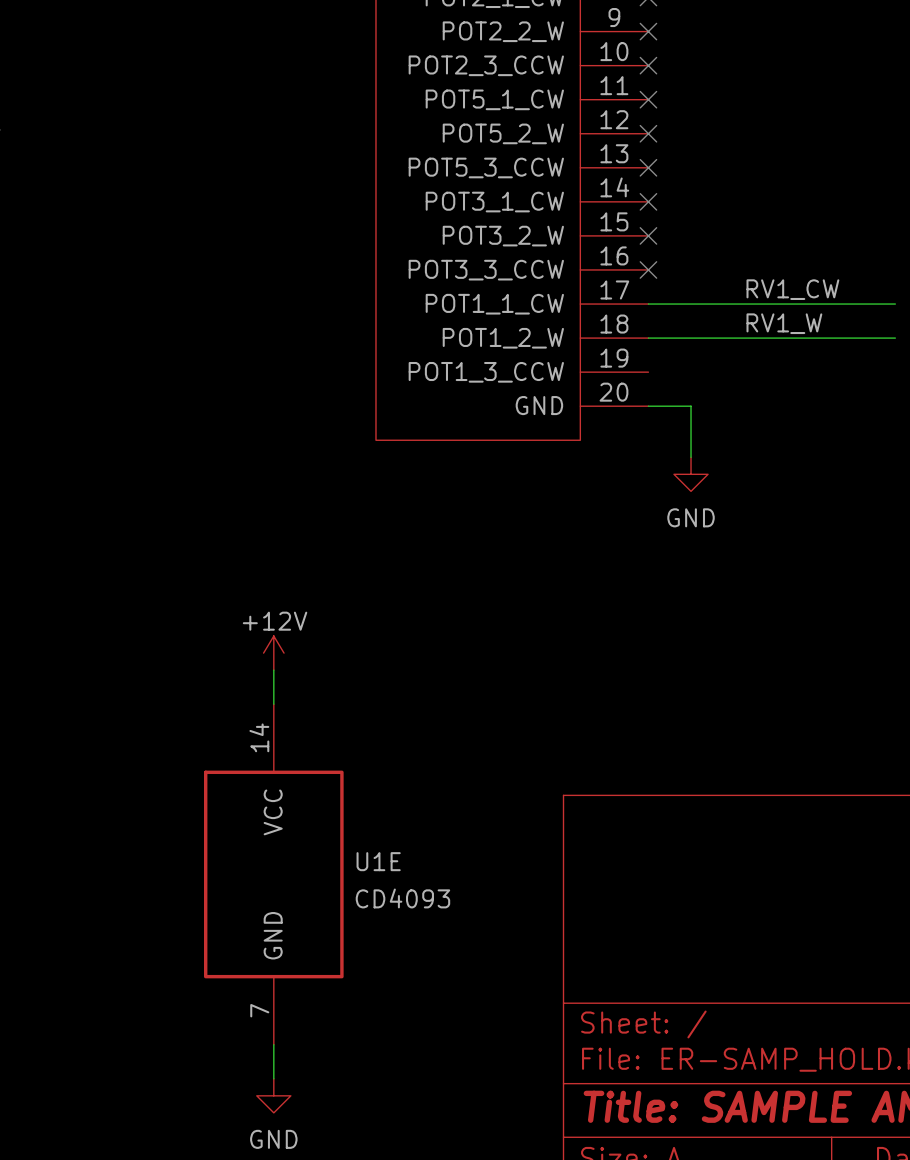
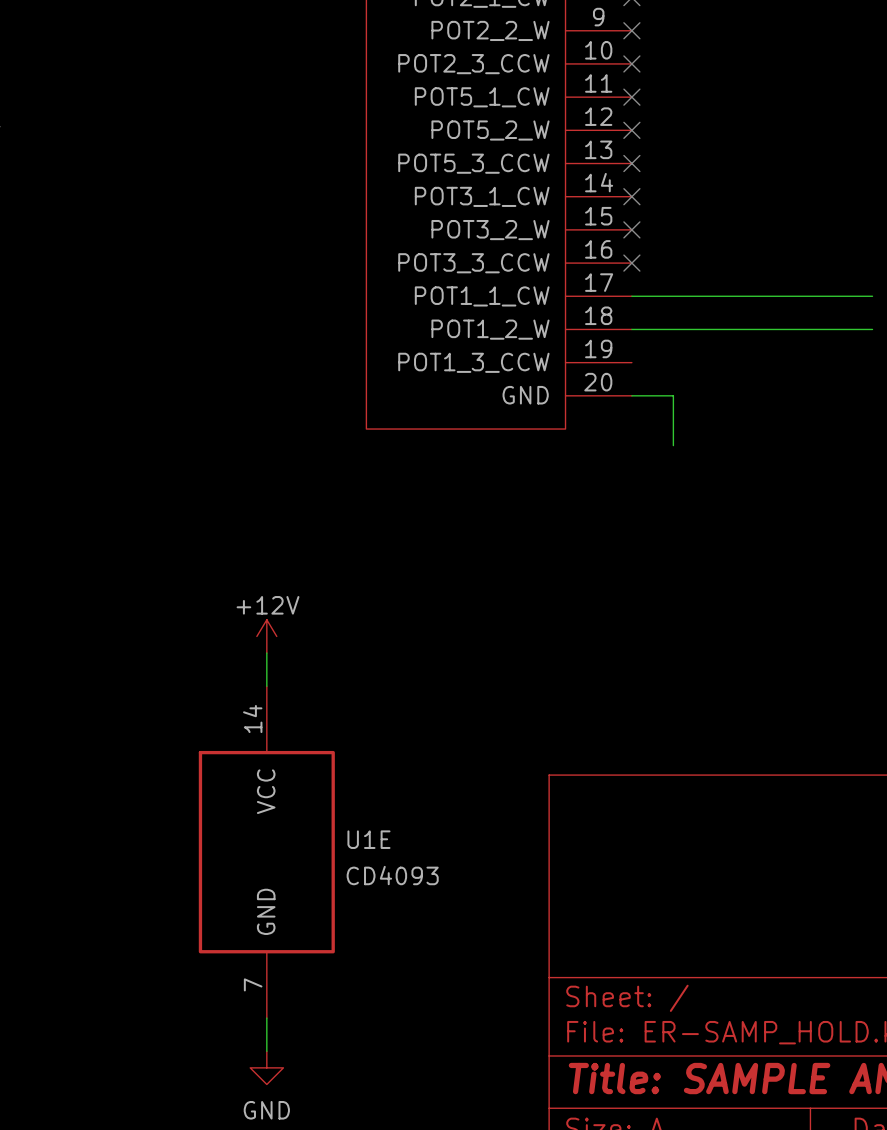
label: RV1_CW (792, 289) -> none
label: RV1_W (784, 323) -> none
power symbol: GND (691, 474) -> none

